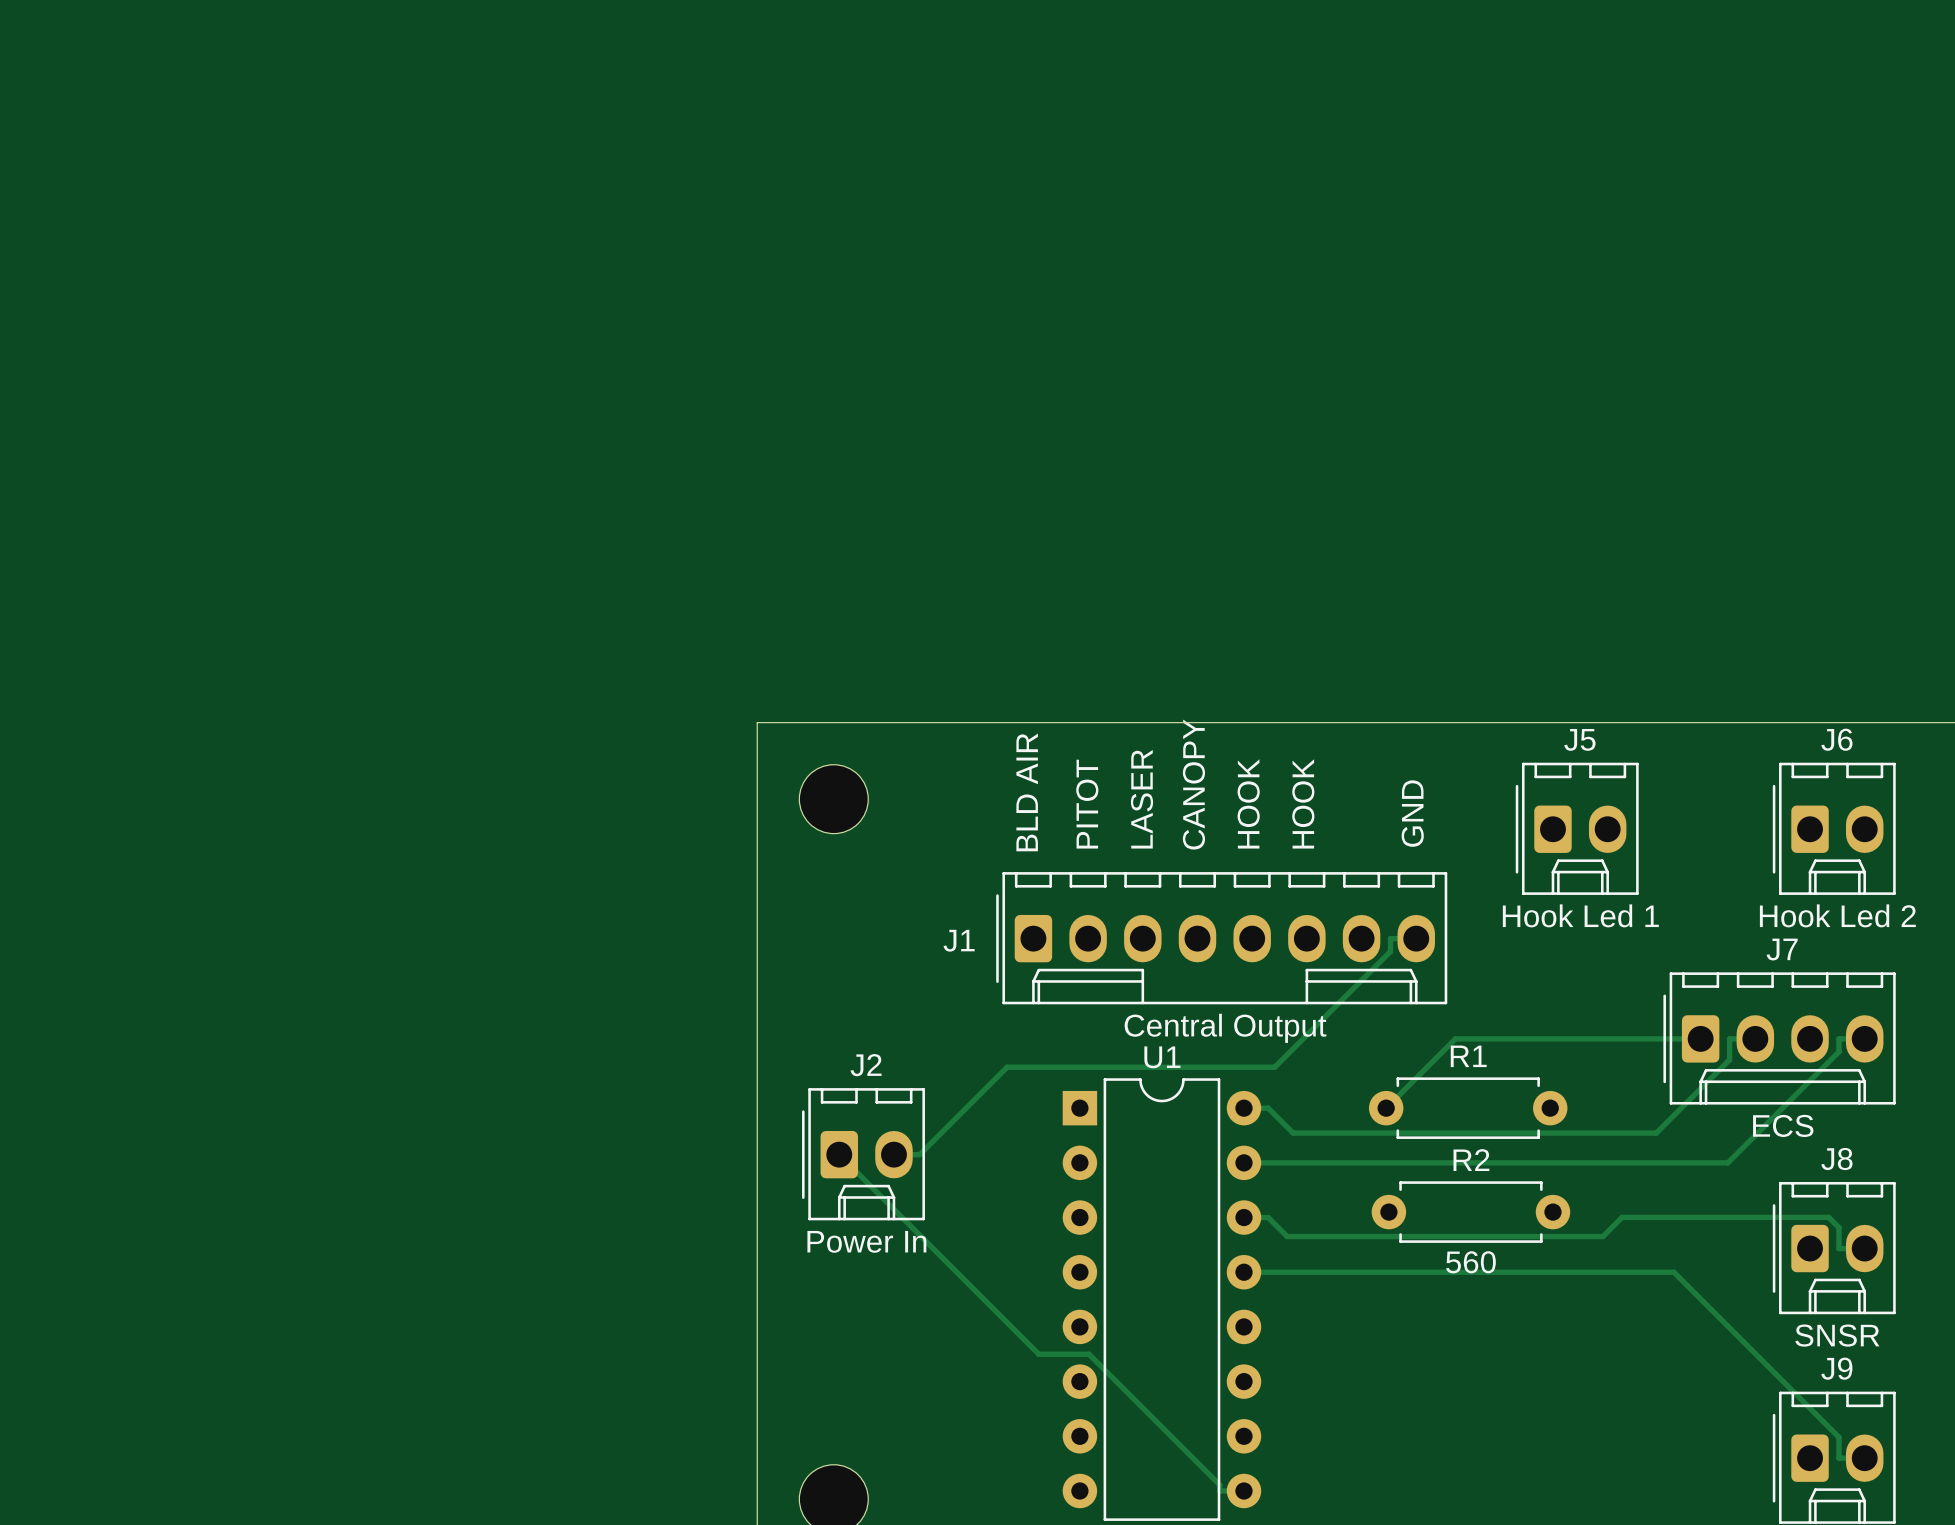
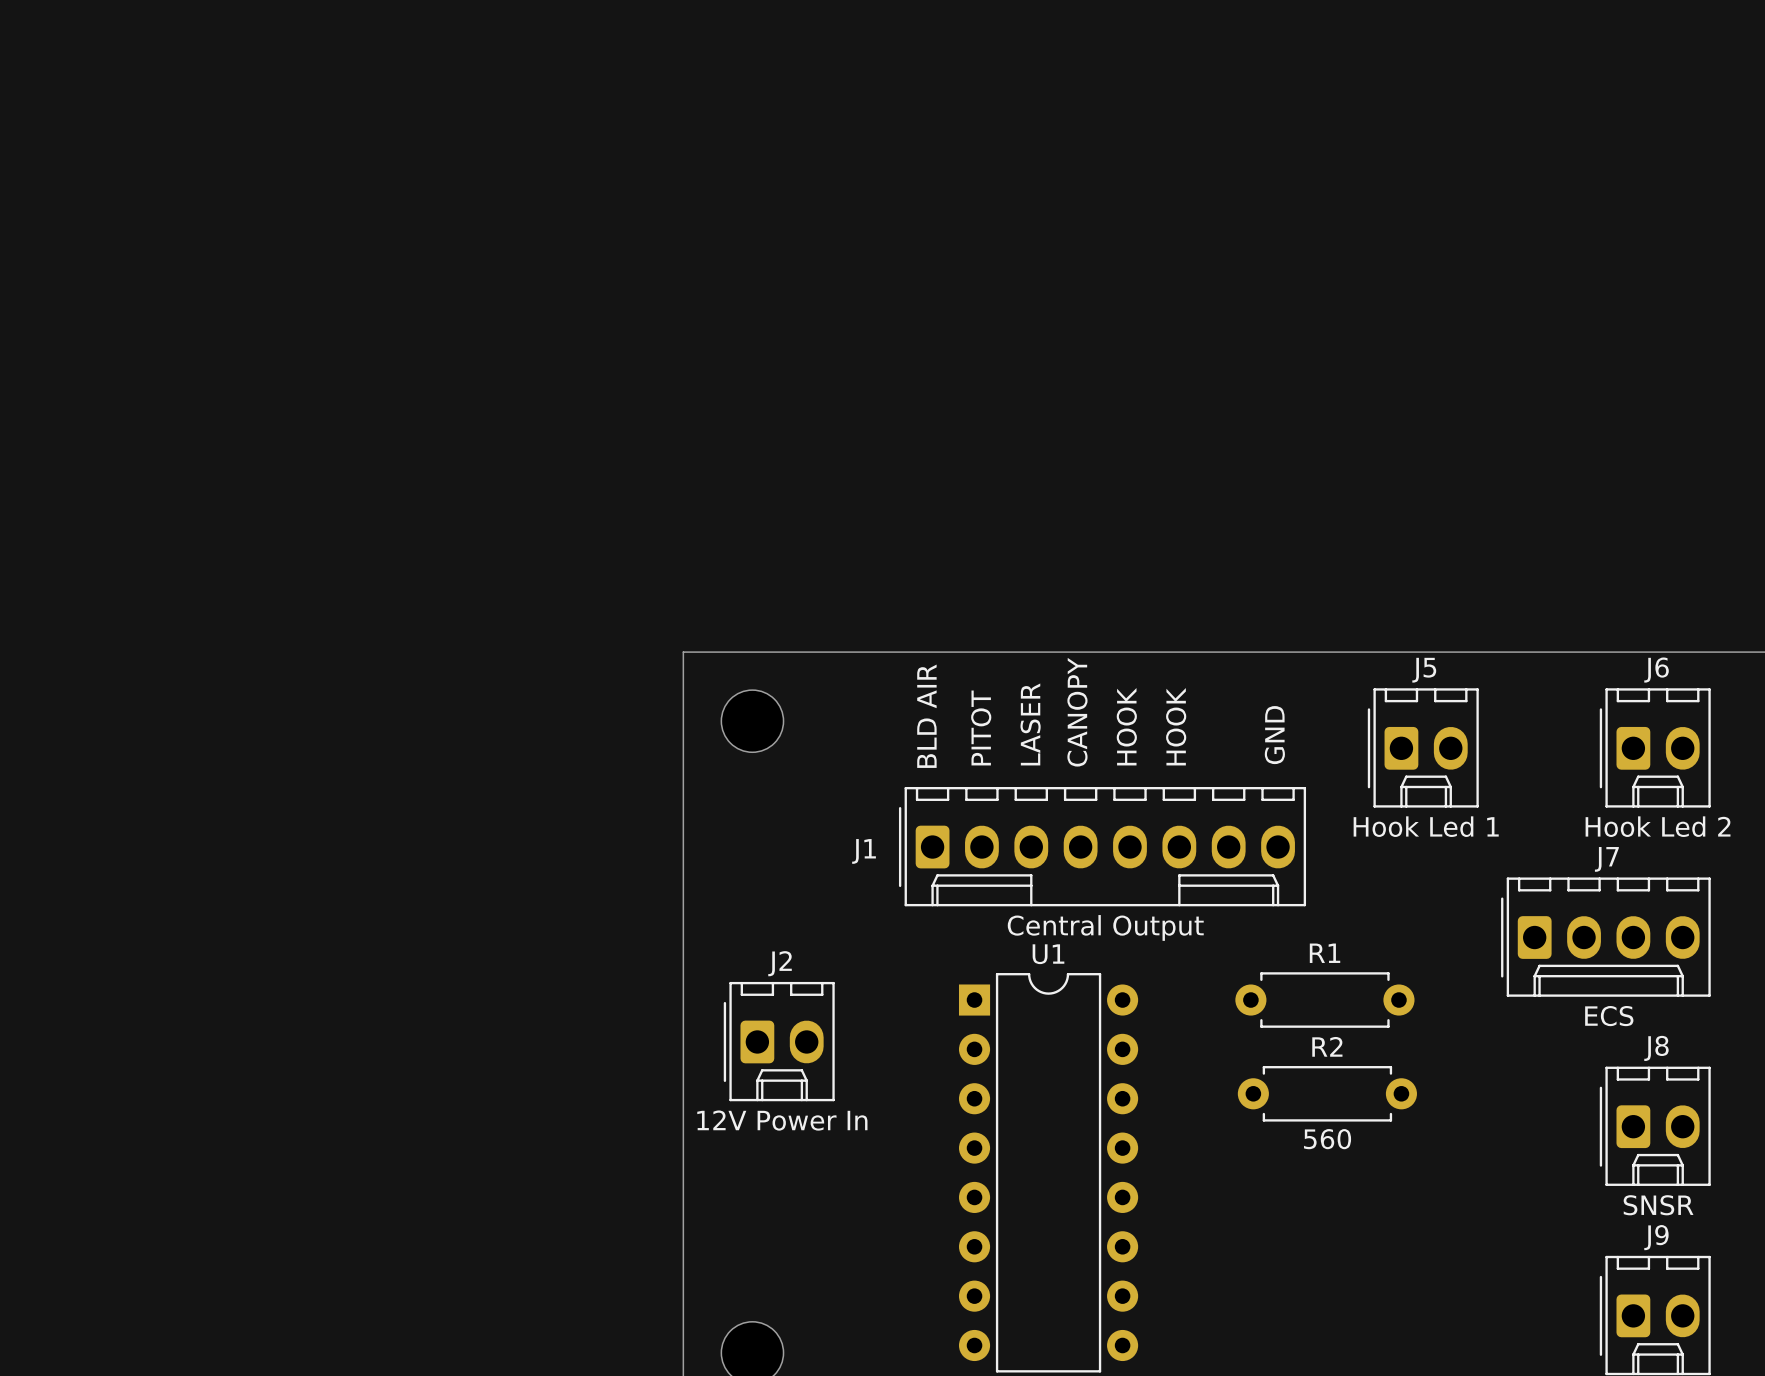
track: (1416, 938) (1390, 938) (1390, 951) (1274, 1067) (1007, 1067) (919, 1154) (893, 1154) -> none
track: (1700, 1038) (1455, 1038) (1386, 1108) -> none
track: (1755, 1038) (1729, 1038) (1729, 1059) (1656, 1133) (1293, 1133) (1268, 1108) (1243, 1108) -> none
track: (1864, 1038) (1838, 1038) (1838, 1051) (1727, 1162) (1243, 1162) -> none
track: (839, 1154) (1038, 1354) (1089, 1354) (1219, 1484) (1219, 1491) (1243, 1491) -> none
track: (1243, 1217) (1268, 1217) (1287, 1236) (1602, 1236) (1622, 1217) (1828, 1217) (1838, 1227) (1838, 1248) (1864, 1248) -> none
J2 value: Power In (866, 1241) -> 12V Power In (782, 1120)
track: (1243, 1272) (1673, 1272) (1838, 1437) (1838, 1458) (1864, 1458) -> none

